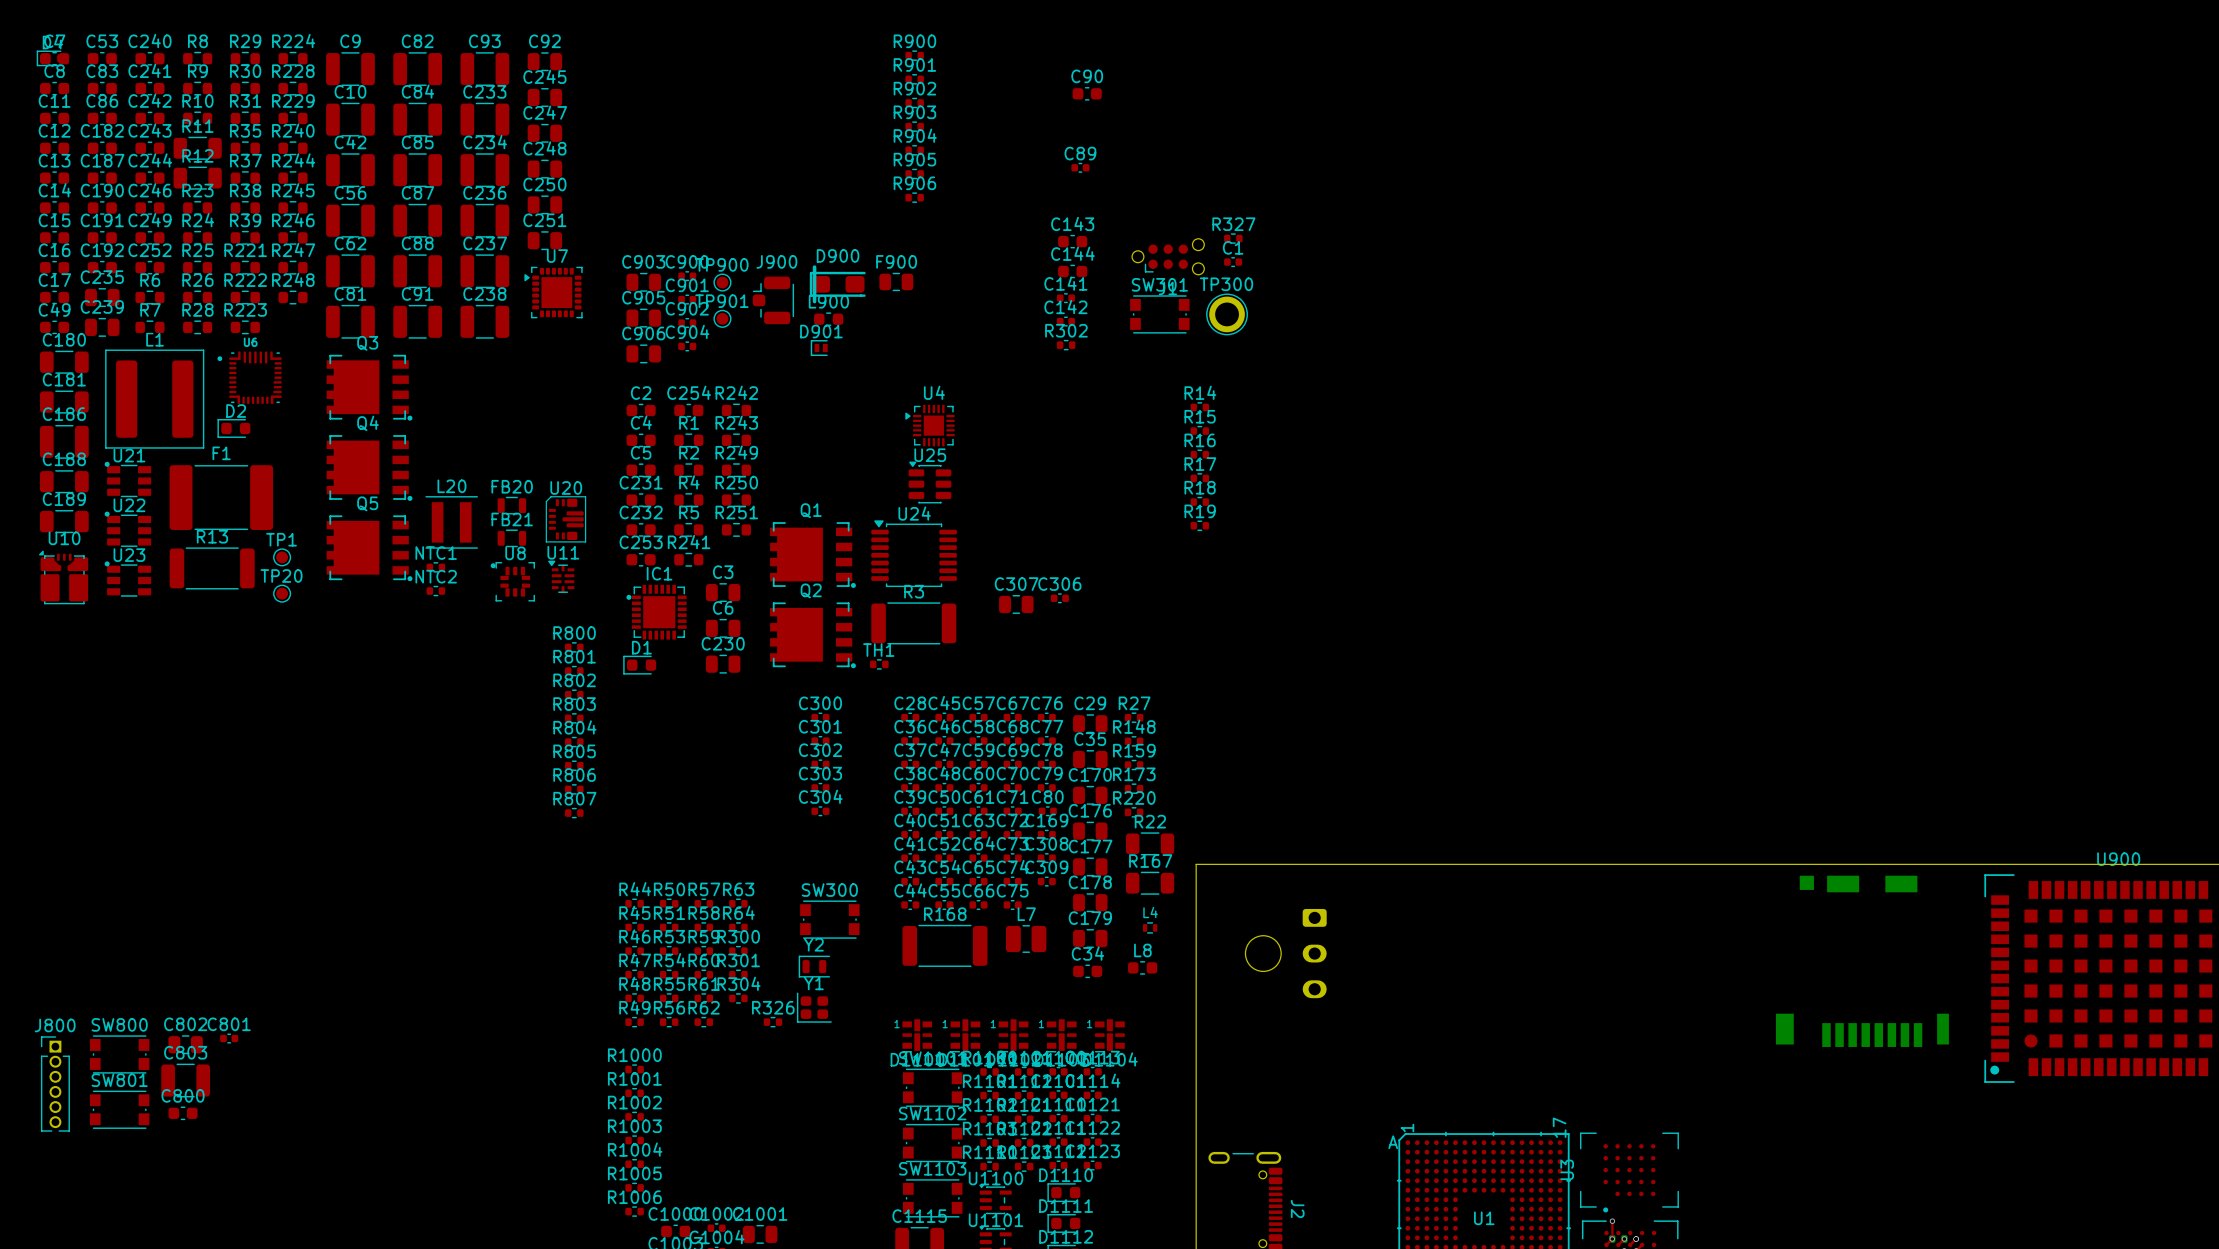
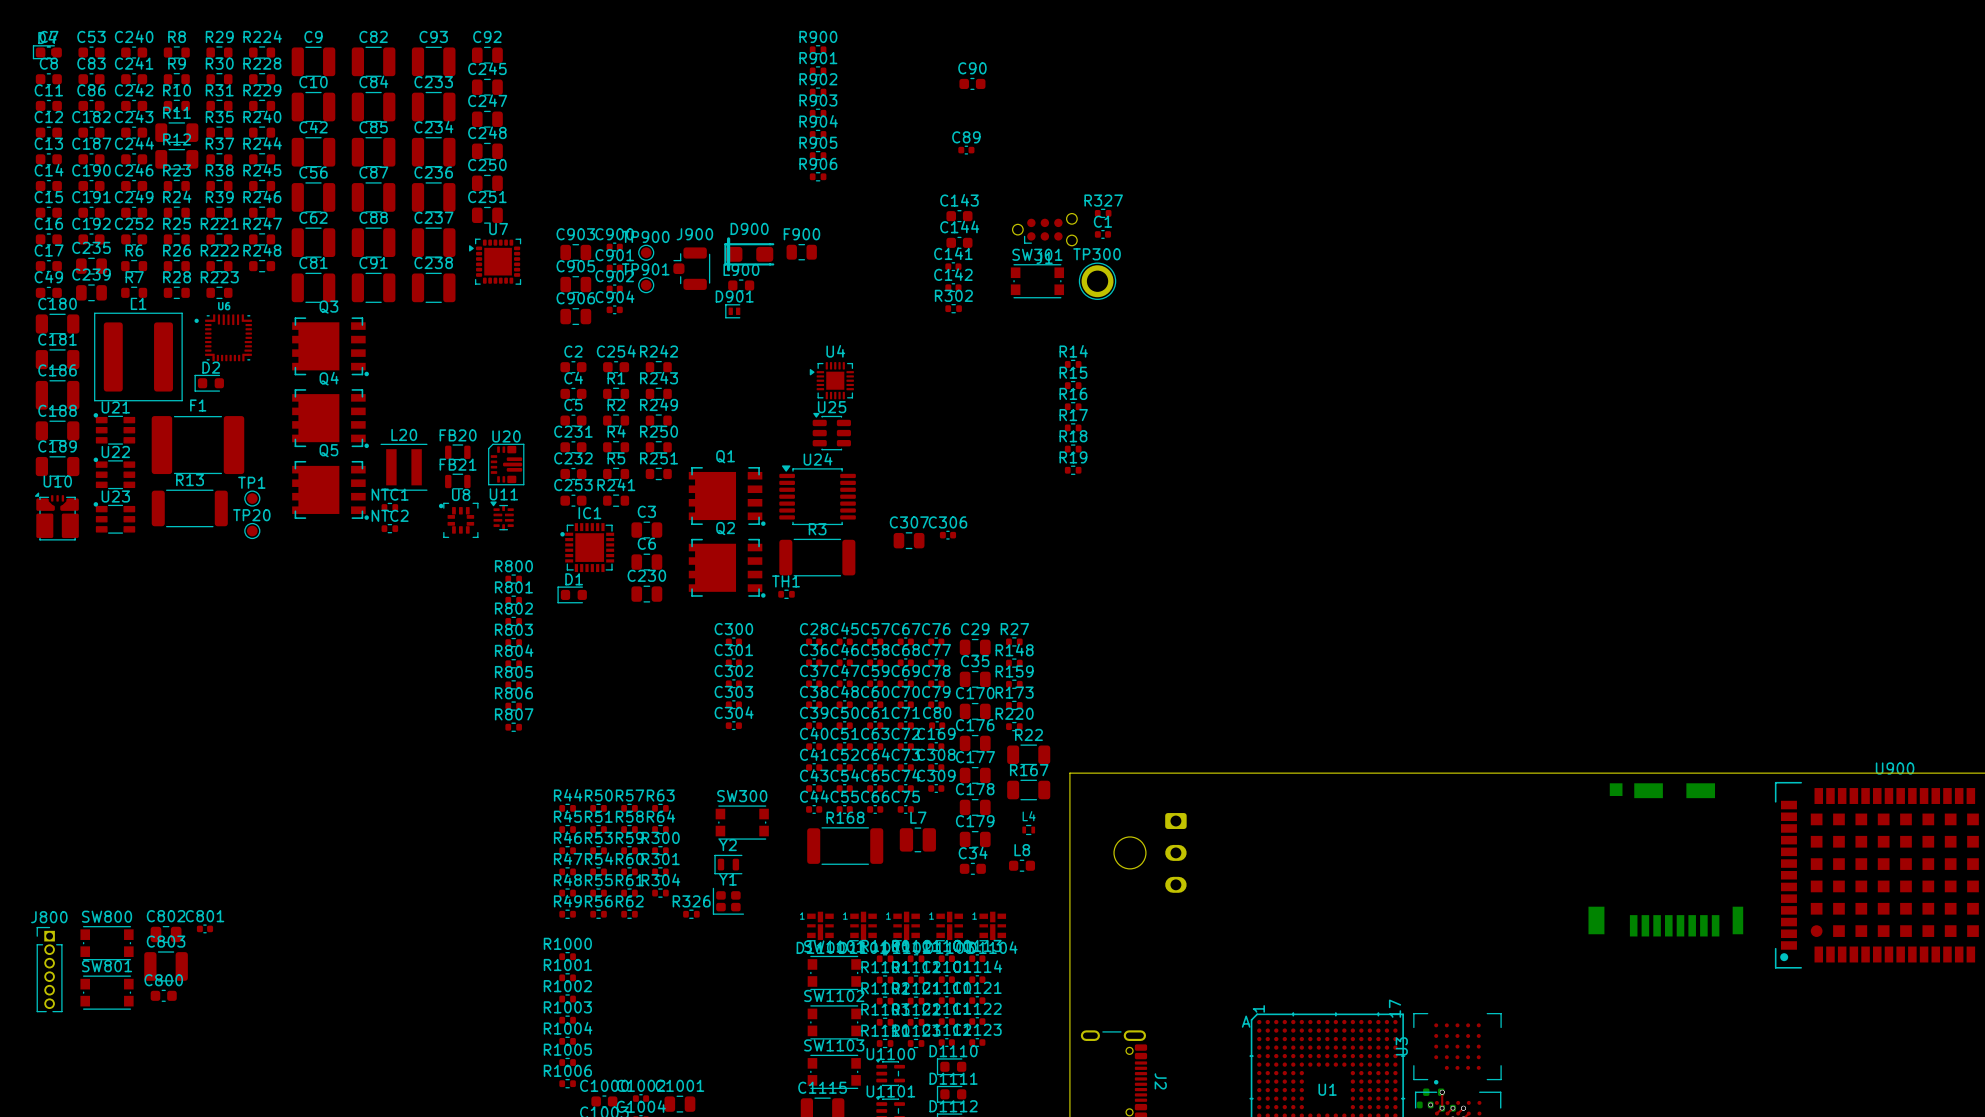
part: none -> (1433, 1092)
part: none -> (1425, 1104)
via: none -> (1430, 1104)

